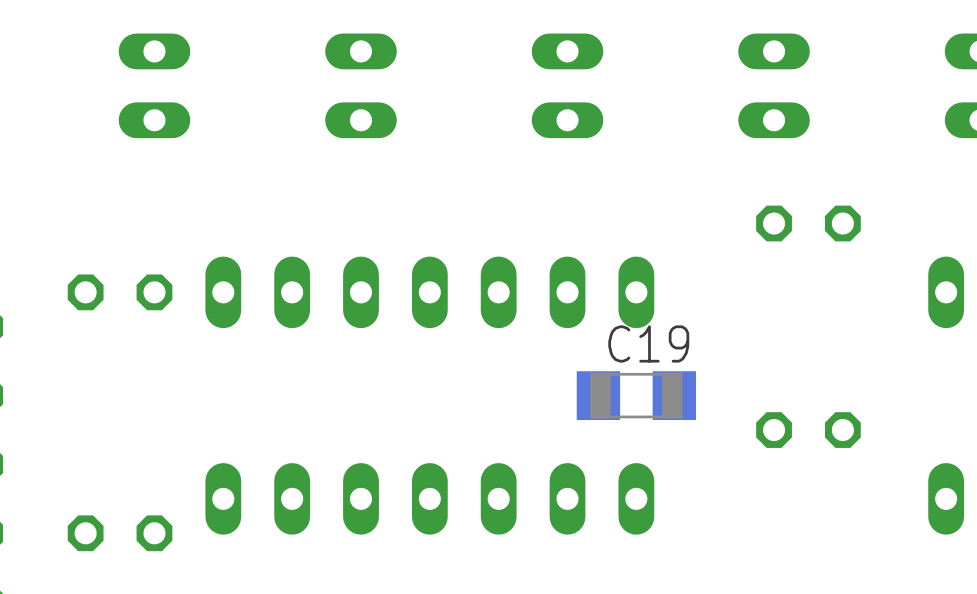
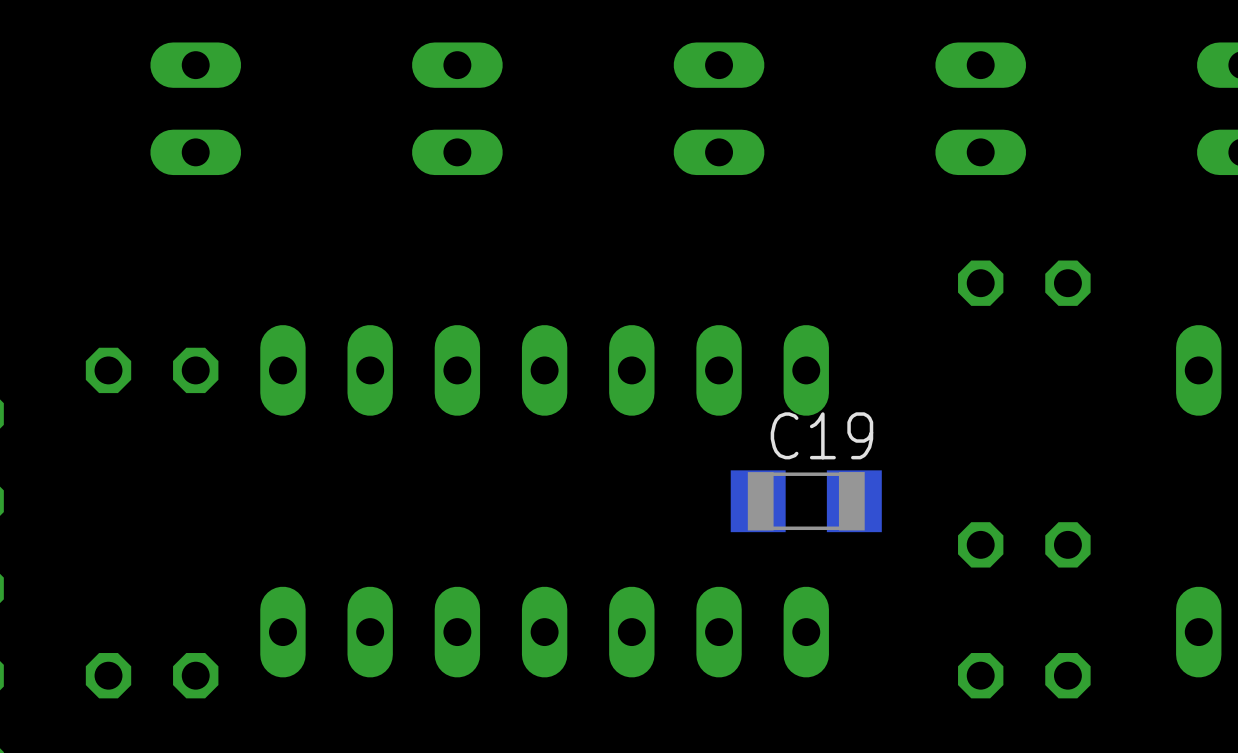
part: none -> (1024, 675)

